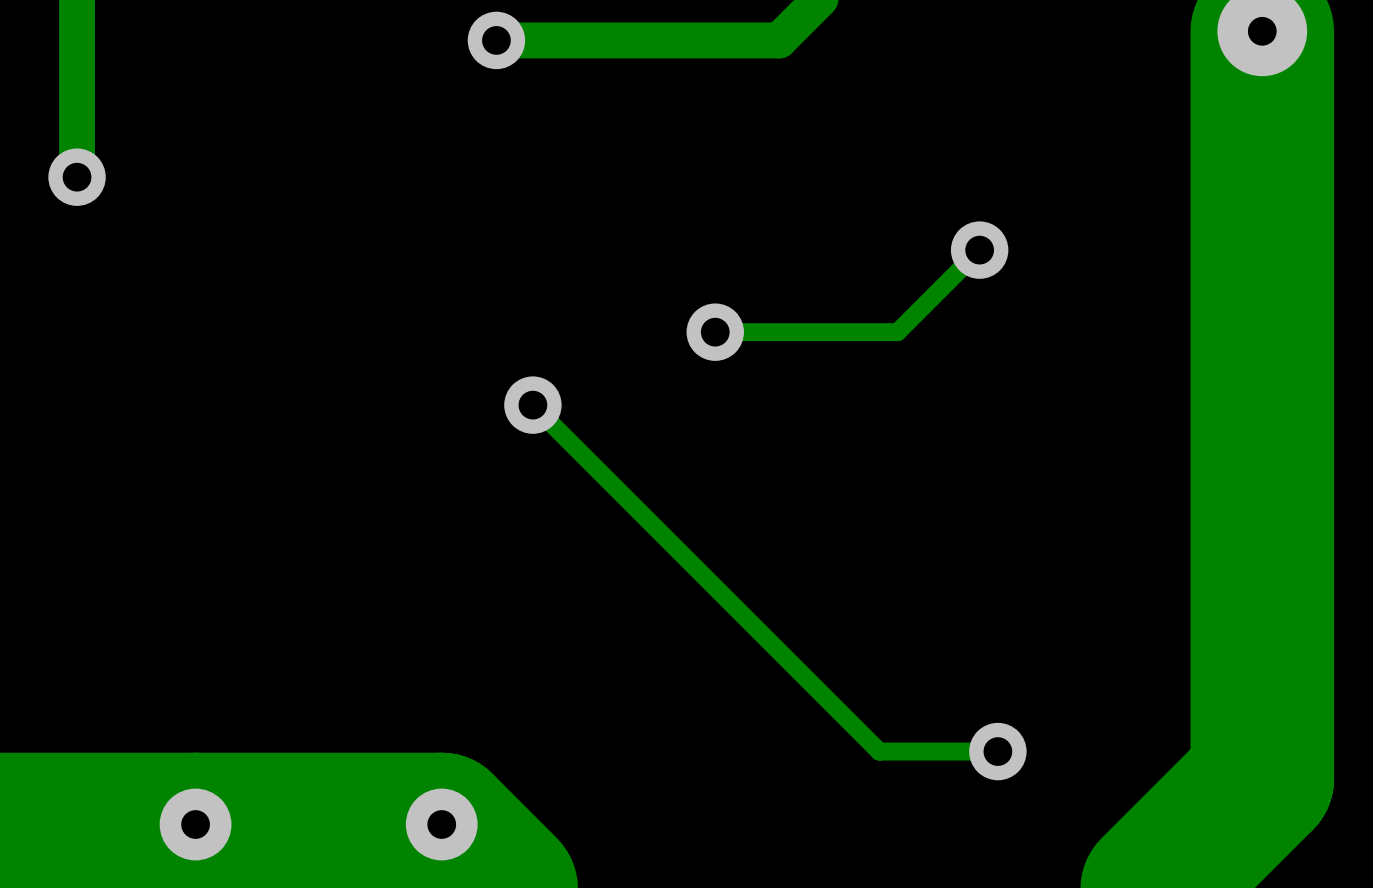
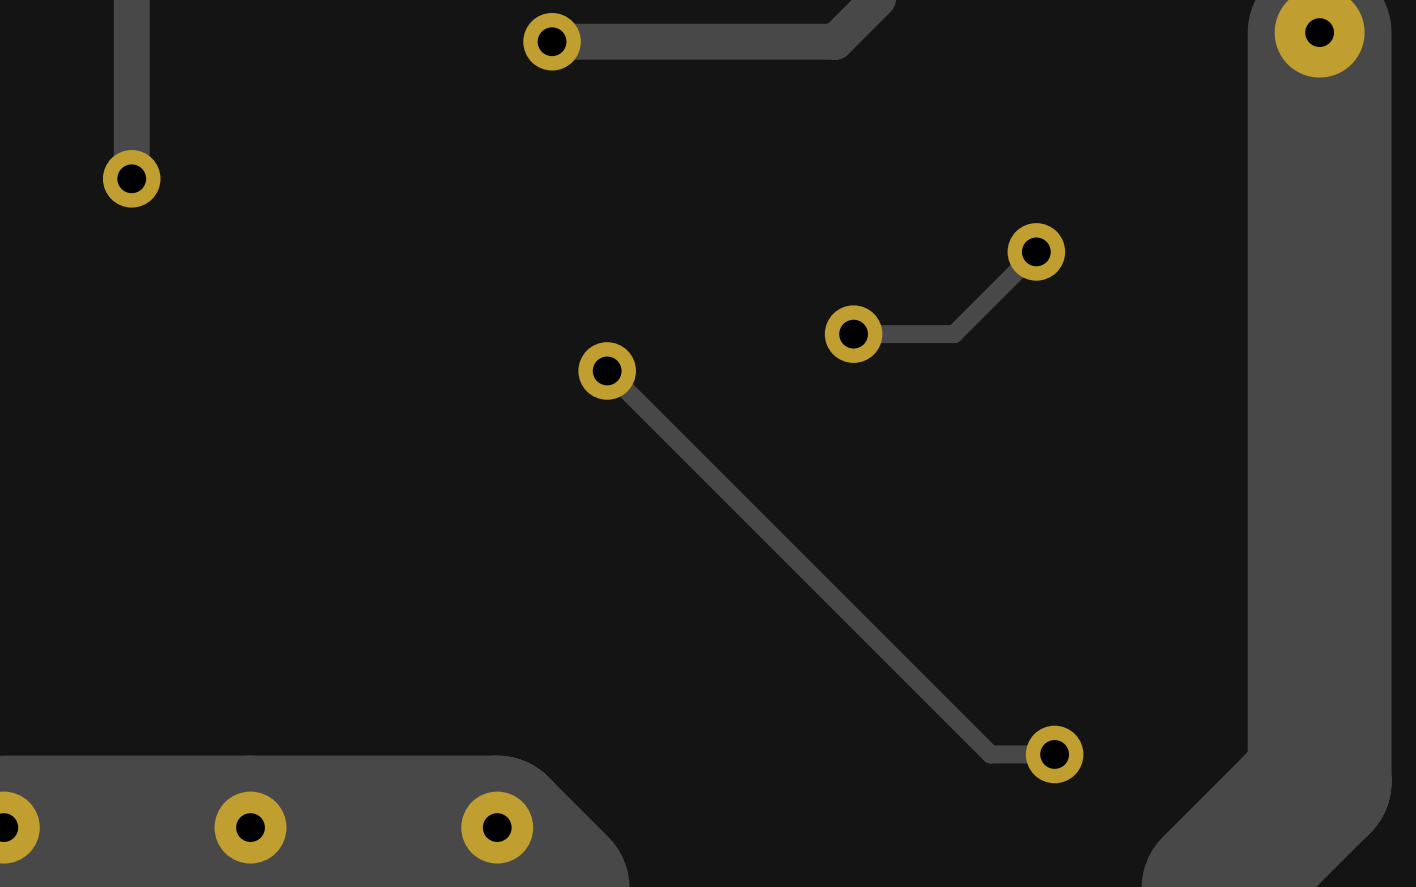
via position: (715, 332) -> (853, 334)
track: (797, 332) (715, 332) -> none
track: (532, 405) (879, 751) (934, 751) -> (607, 370) (990, 754)
via position: (532, 405) -> (607, 370)

